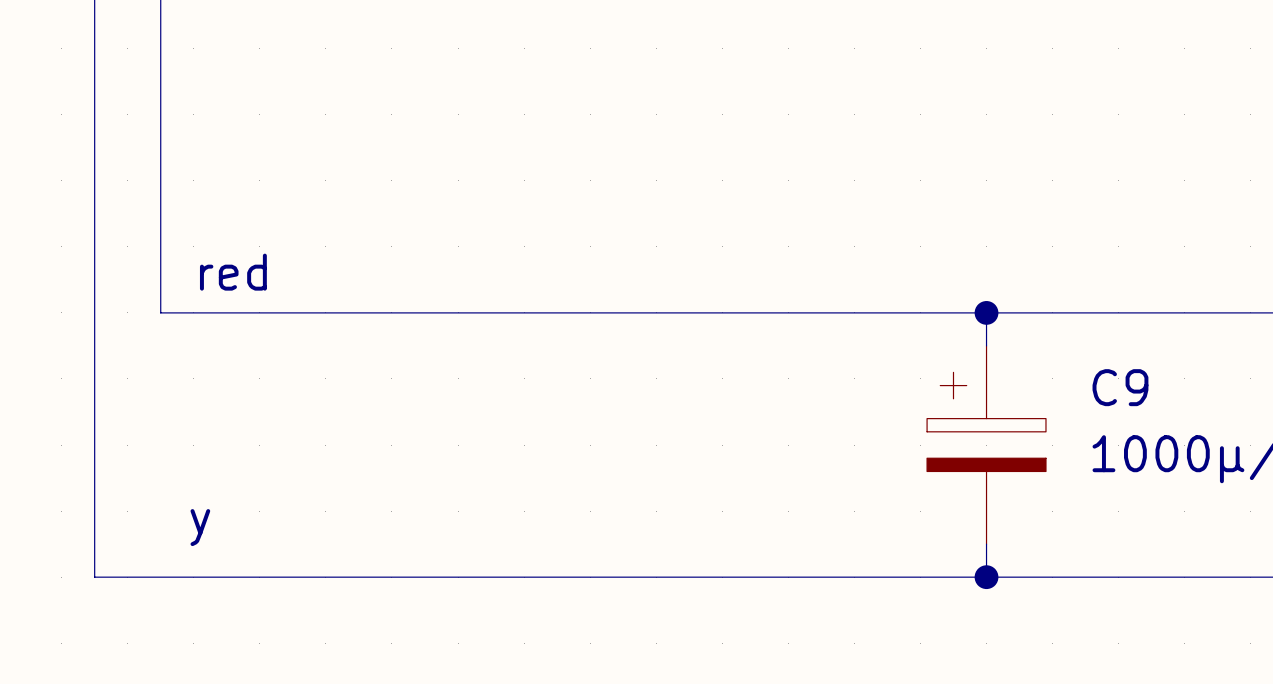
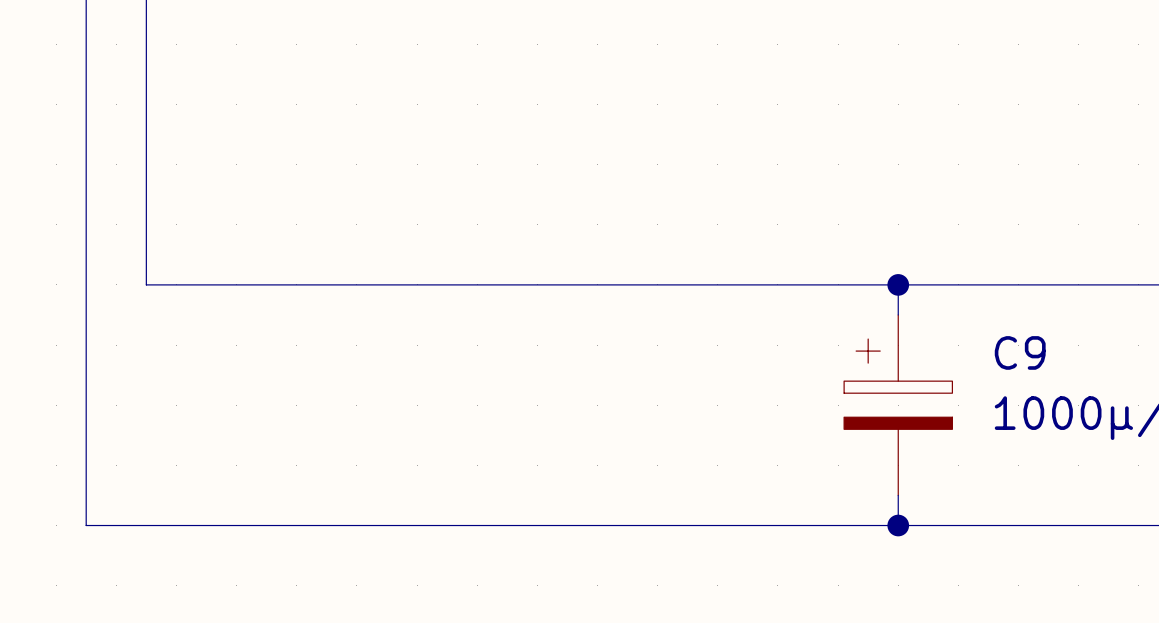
text: red (233, 272) -> none
text: y (200, 527) -> none

